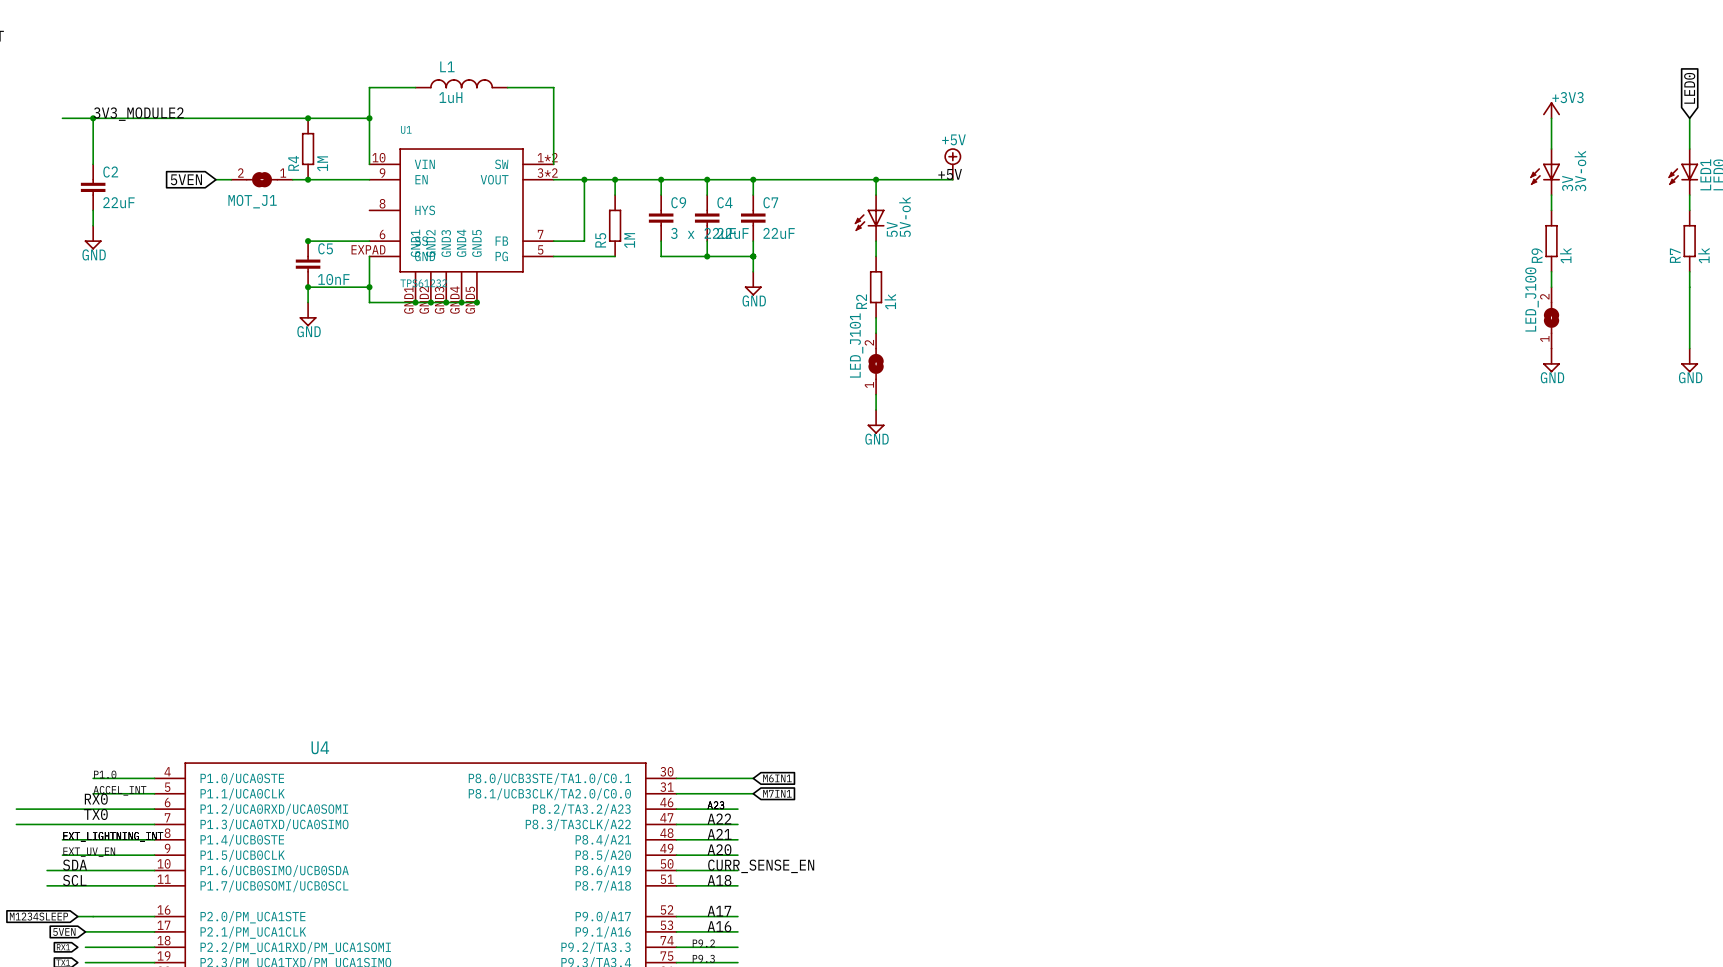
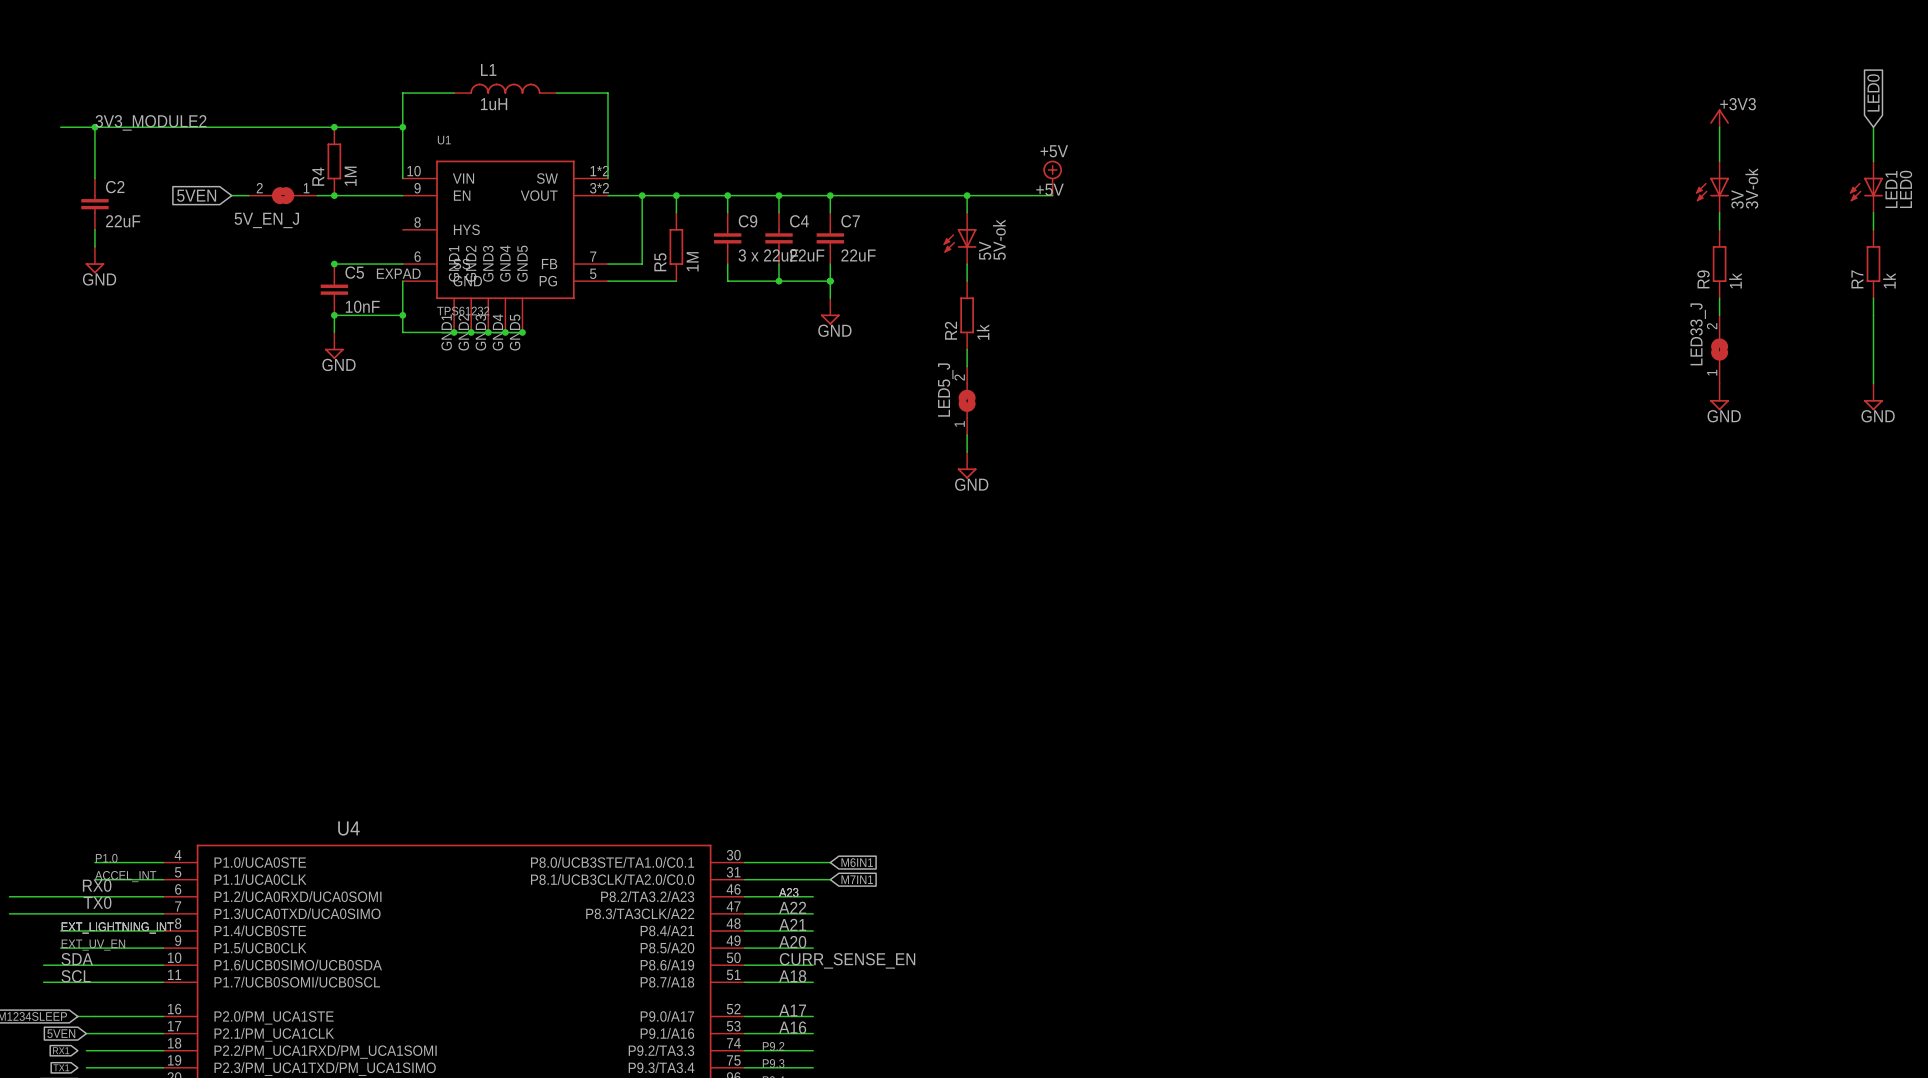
MOT_J1 name: MOT_J1 (252, 201) -> 5V_EN_J (266, 220)
LED_J100 name: LED_J100 (1532, 299) -> LED33_J (1698, 334)
LED_J101 name: LED_J101 (856, 345) -> LED5_J (945, 390)

